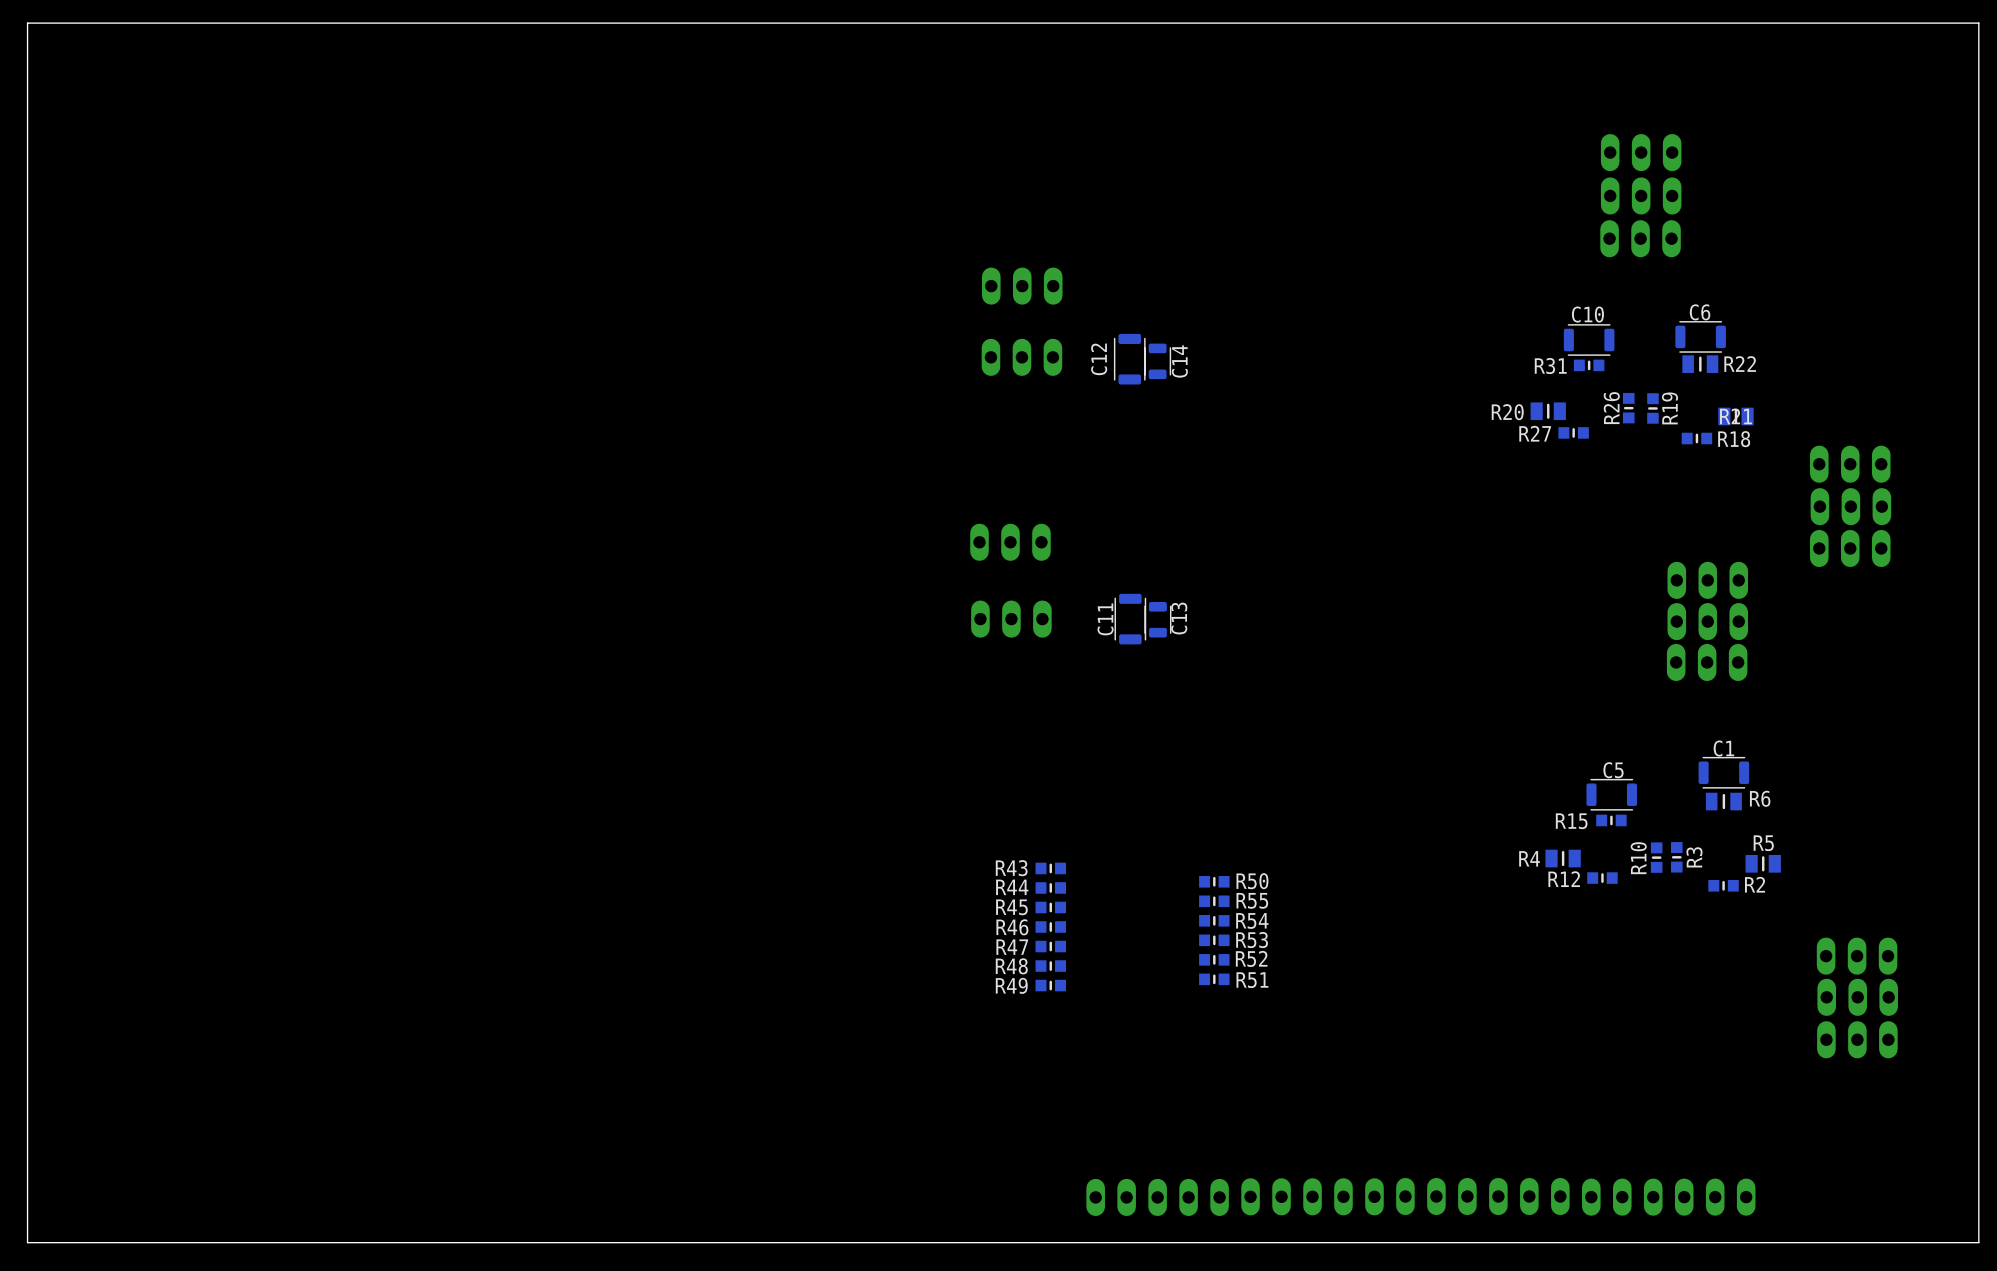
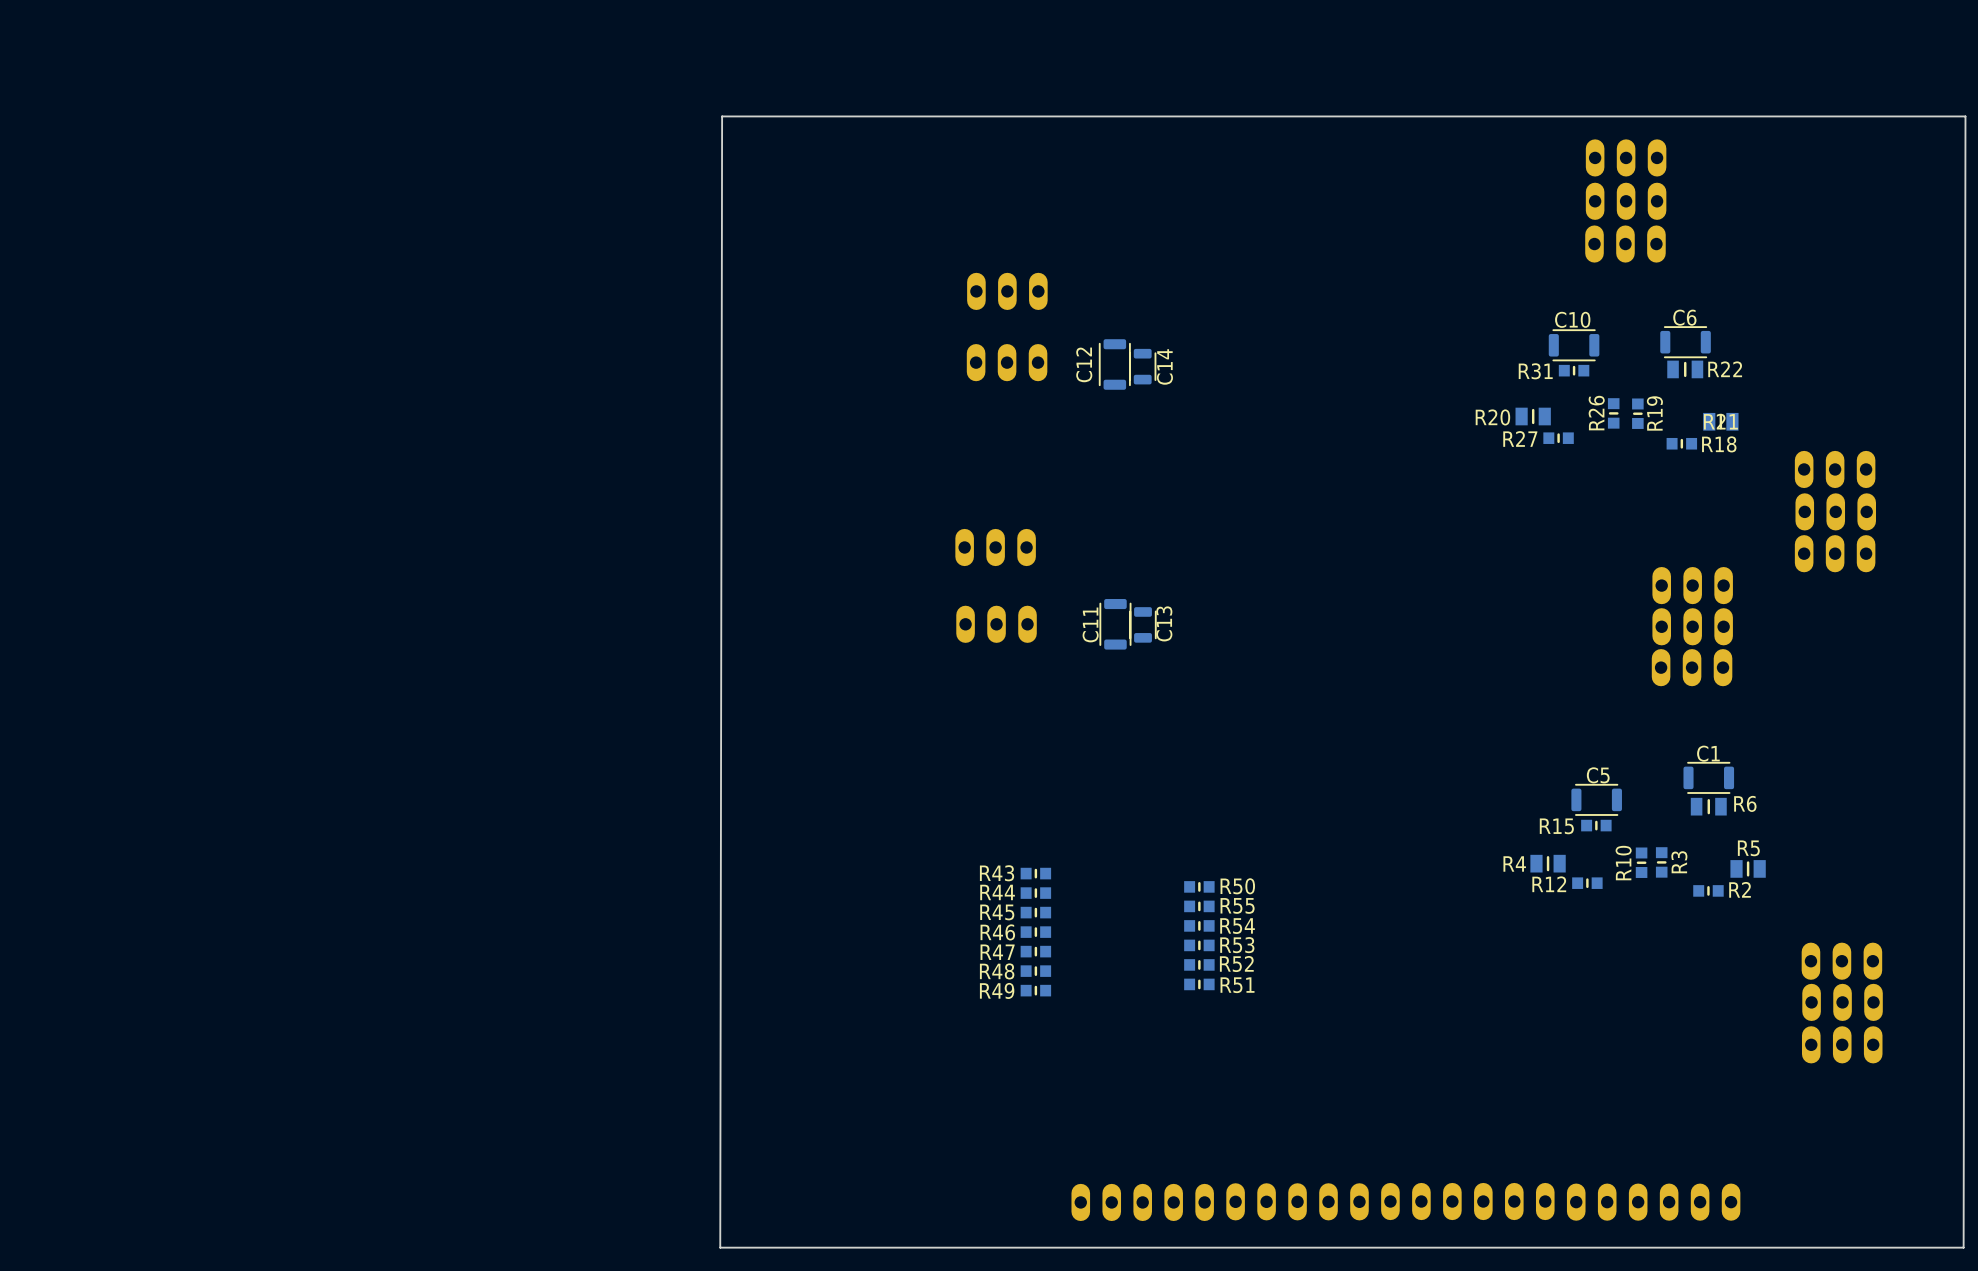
board edge: (1978, 1242) (1978, 23) (27, 23) (27, 1242) (735, 1242) -> (1963, 1247) (1965, 116) (722, 116) (720, 1247)

